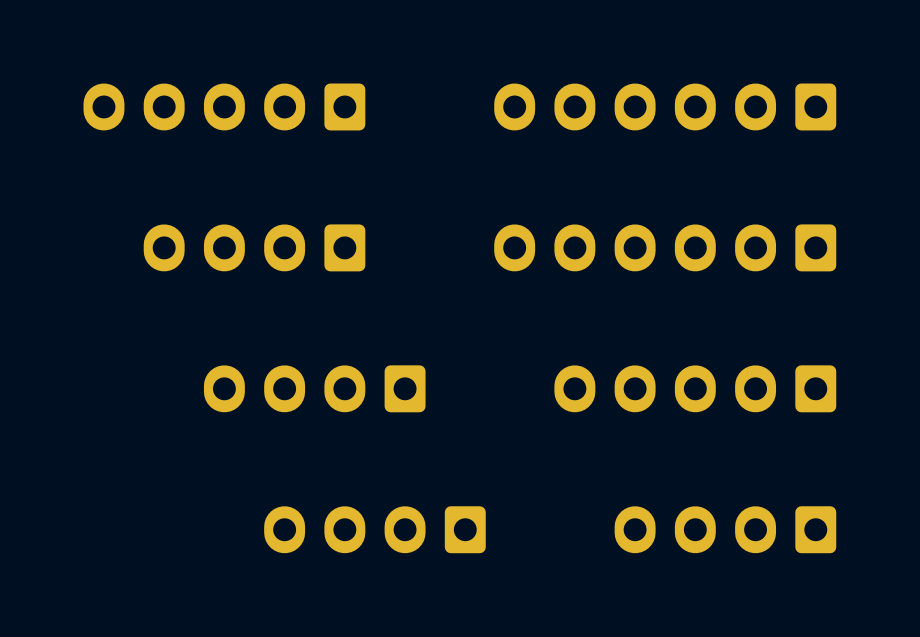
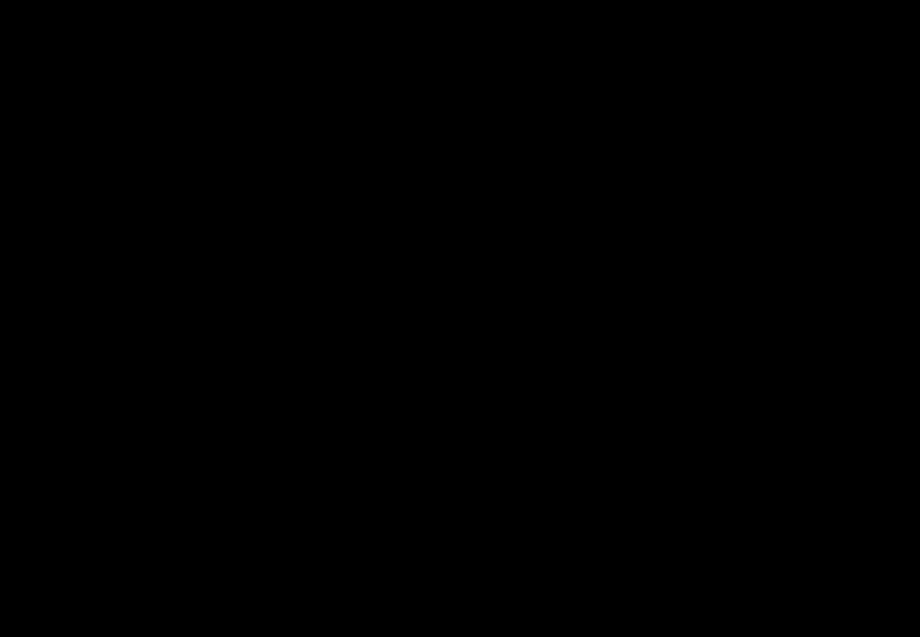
part: (224, 106) -> none
part: (665, 106) -> none
part: (254, 247) -> none
part: (665, 247) -> none
part: (314, 388) -> none
part: (695, 388) -> none
part: (374, 529) -> none
part: (725, 529) -> none

